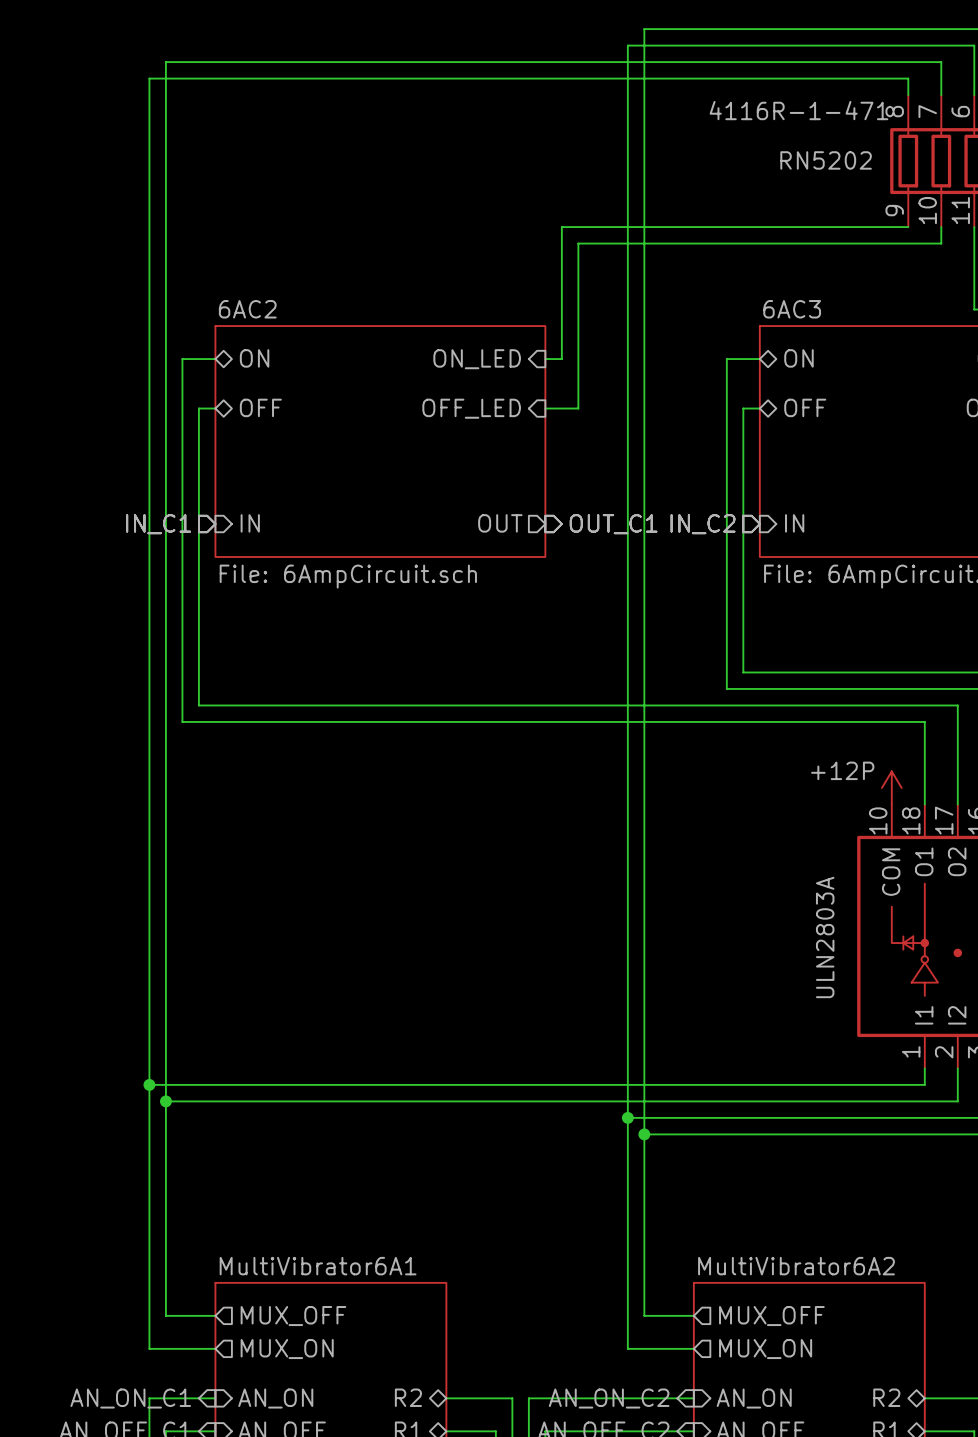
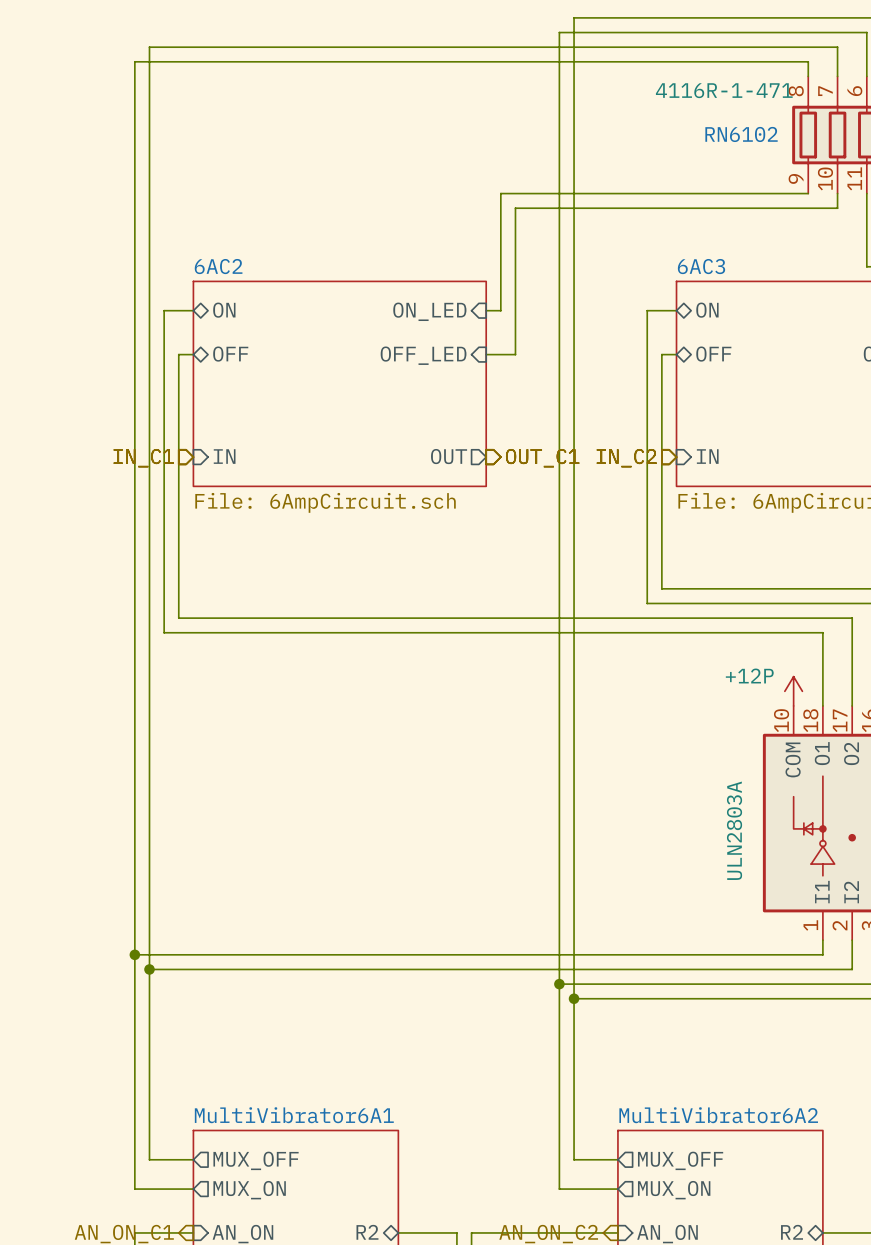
RN5202 name: RN5202 (826, 160) -> RN6102 (741, 134)

